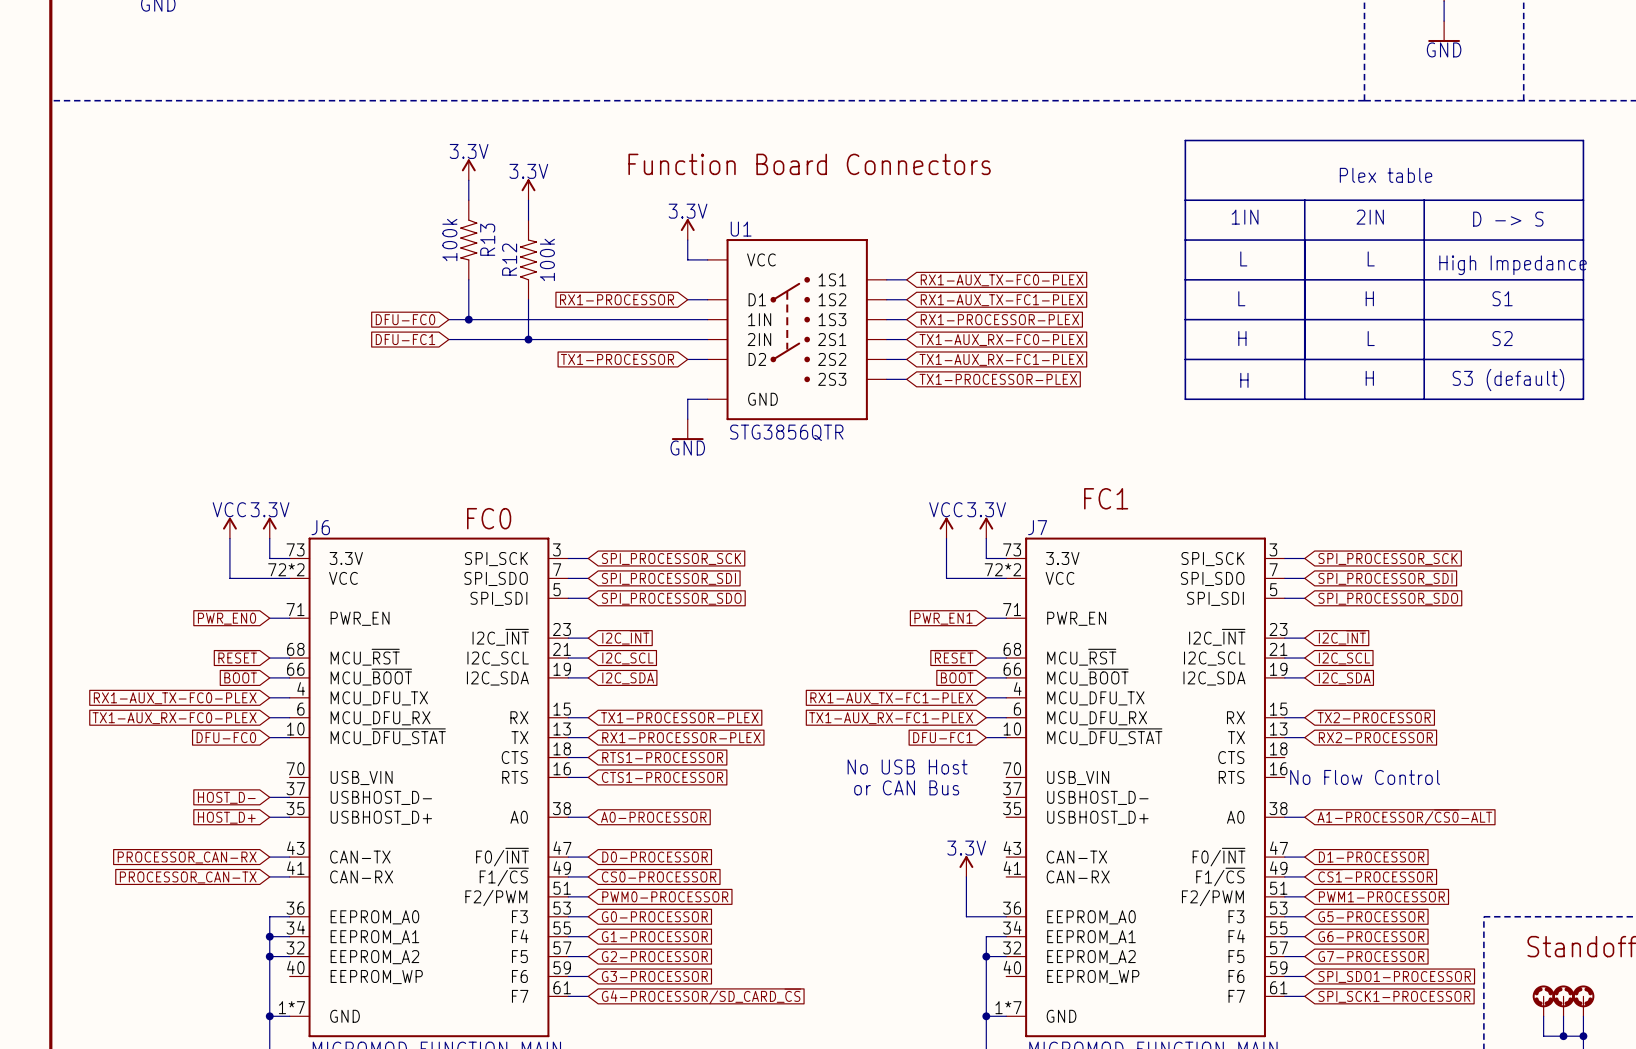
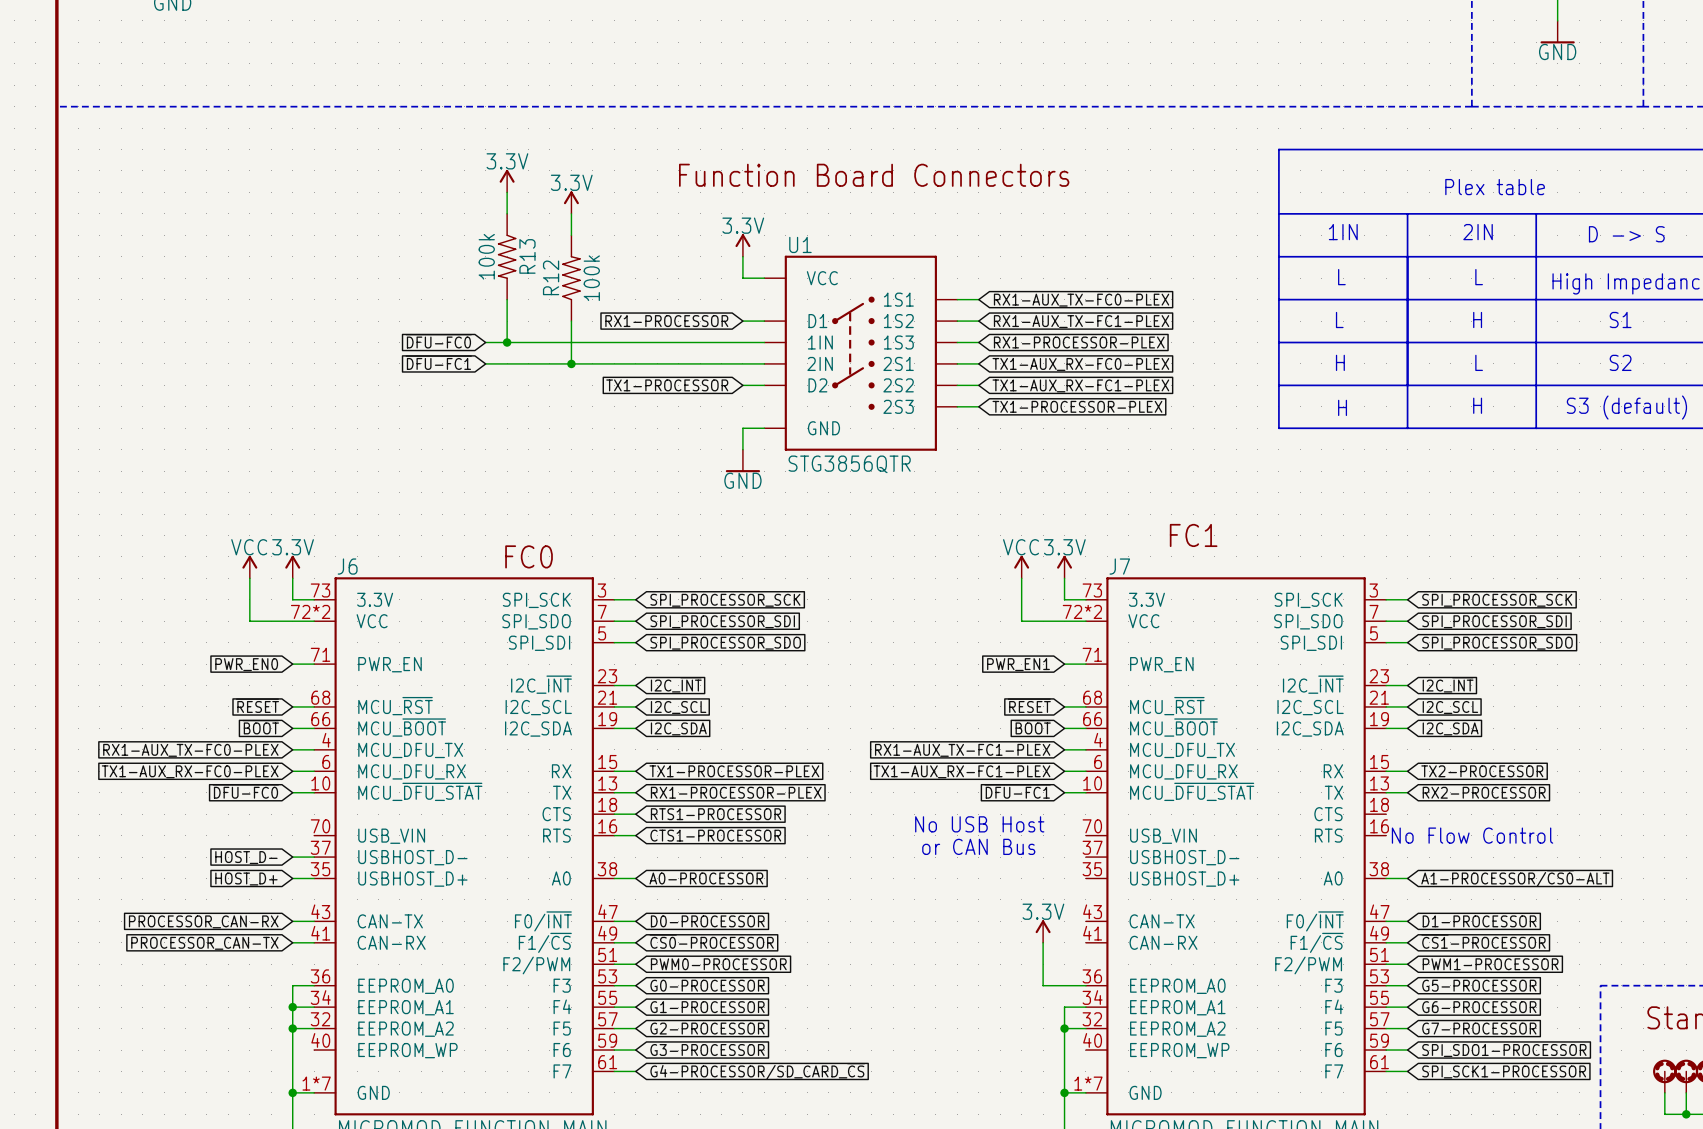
global label: DFU-FC0 (405, 319) -> ~{DFU-FC0} (438, 341)
global label: DFU-FC1 (405, 339) -> ~{DFU-FC1} (438, 362)
global label: DFU-FC0 (226, 737) -> ~{DFU-FC0} (245, 791)
global label: DFU-FC1 (942, 737) -> ~{DFU-FC1} (1017, 791)

